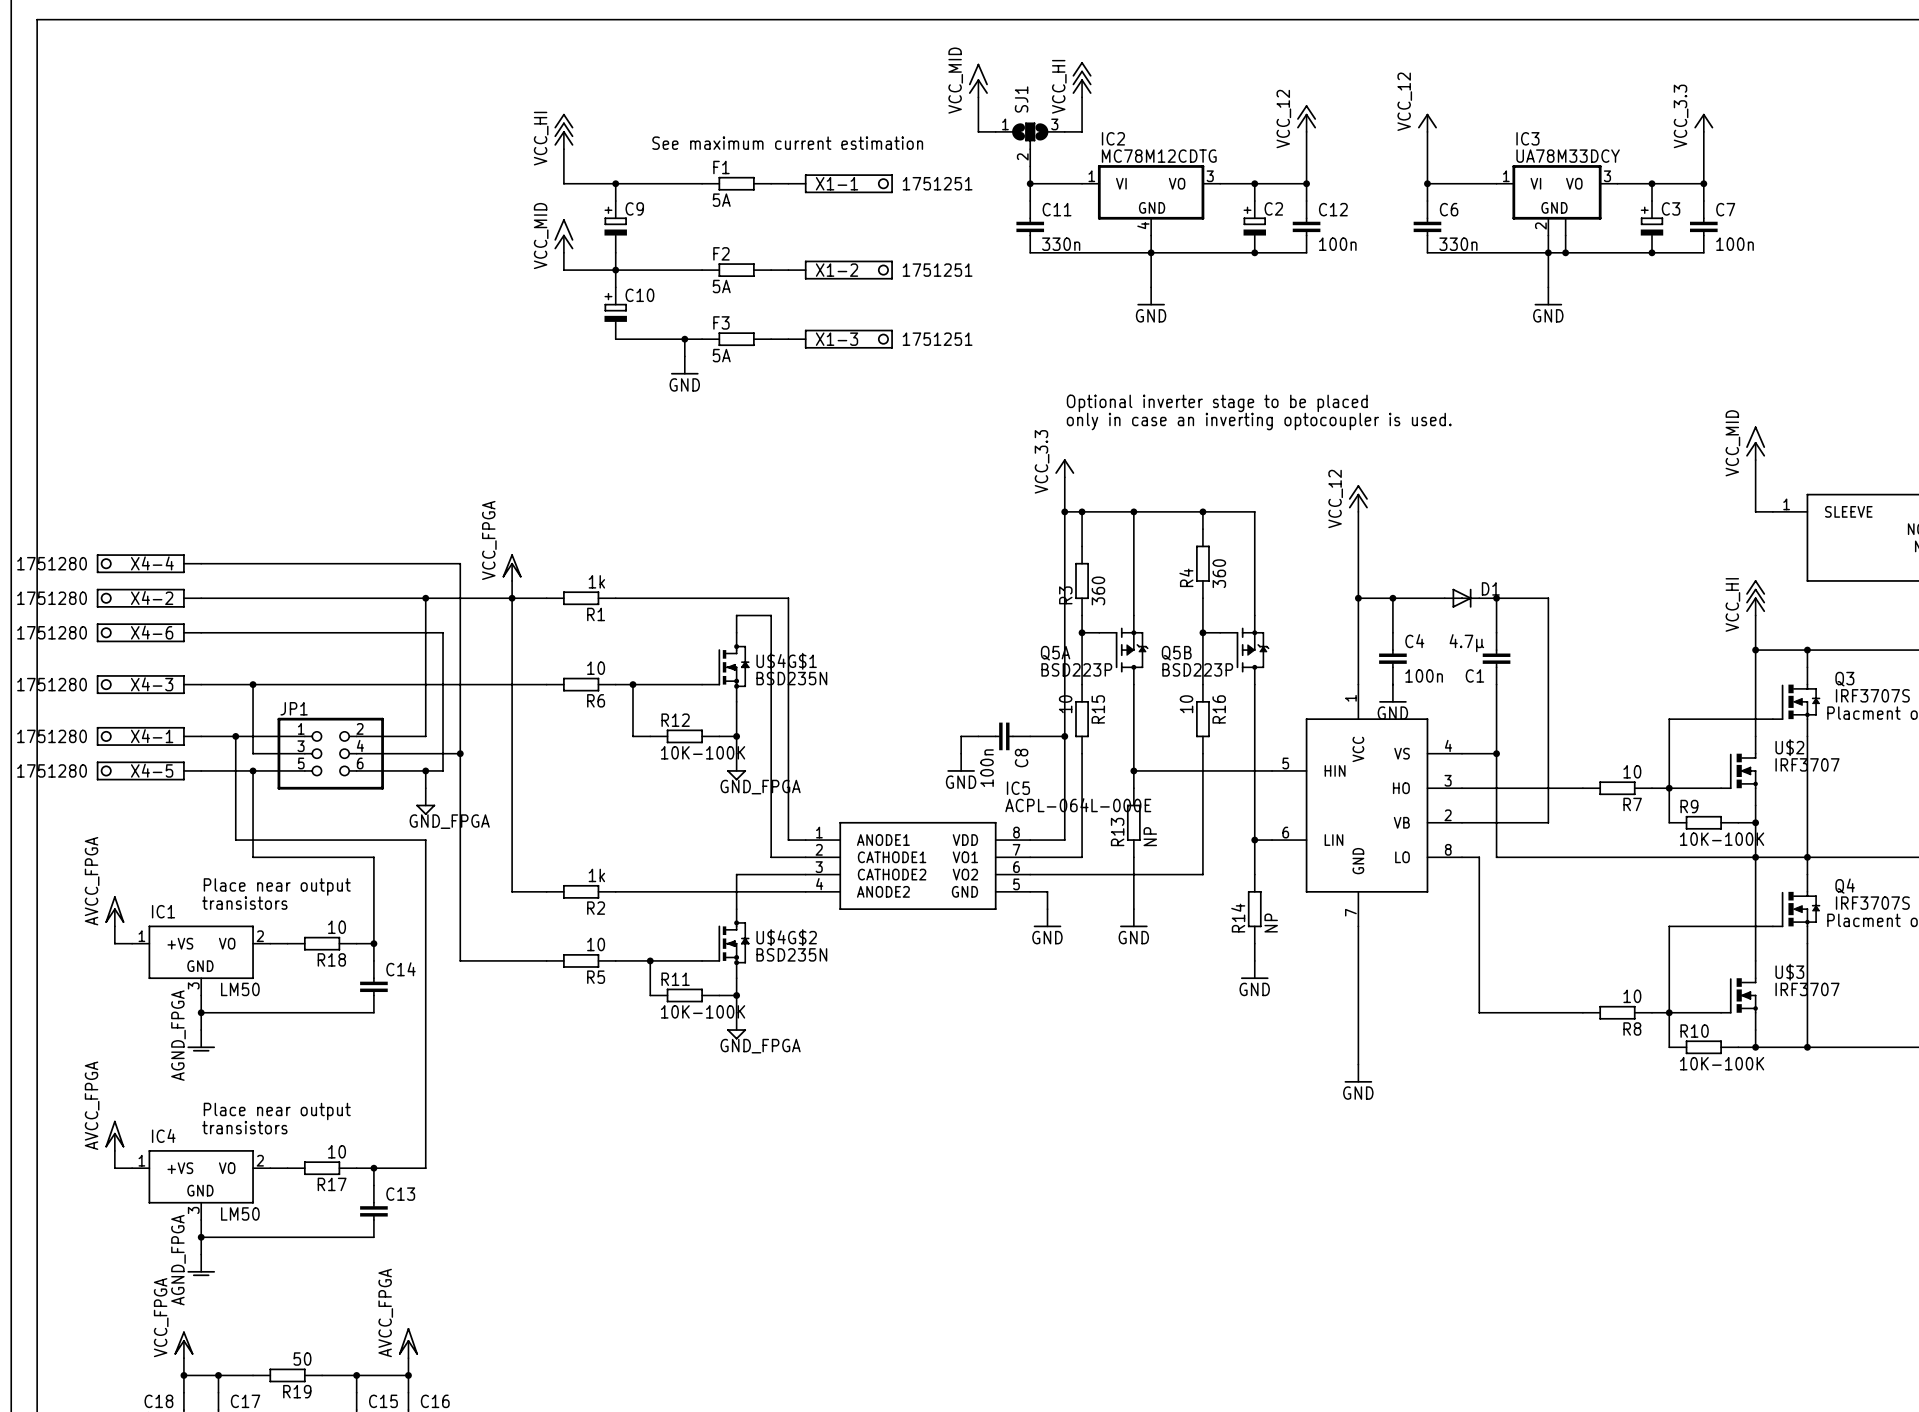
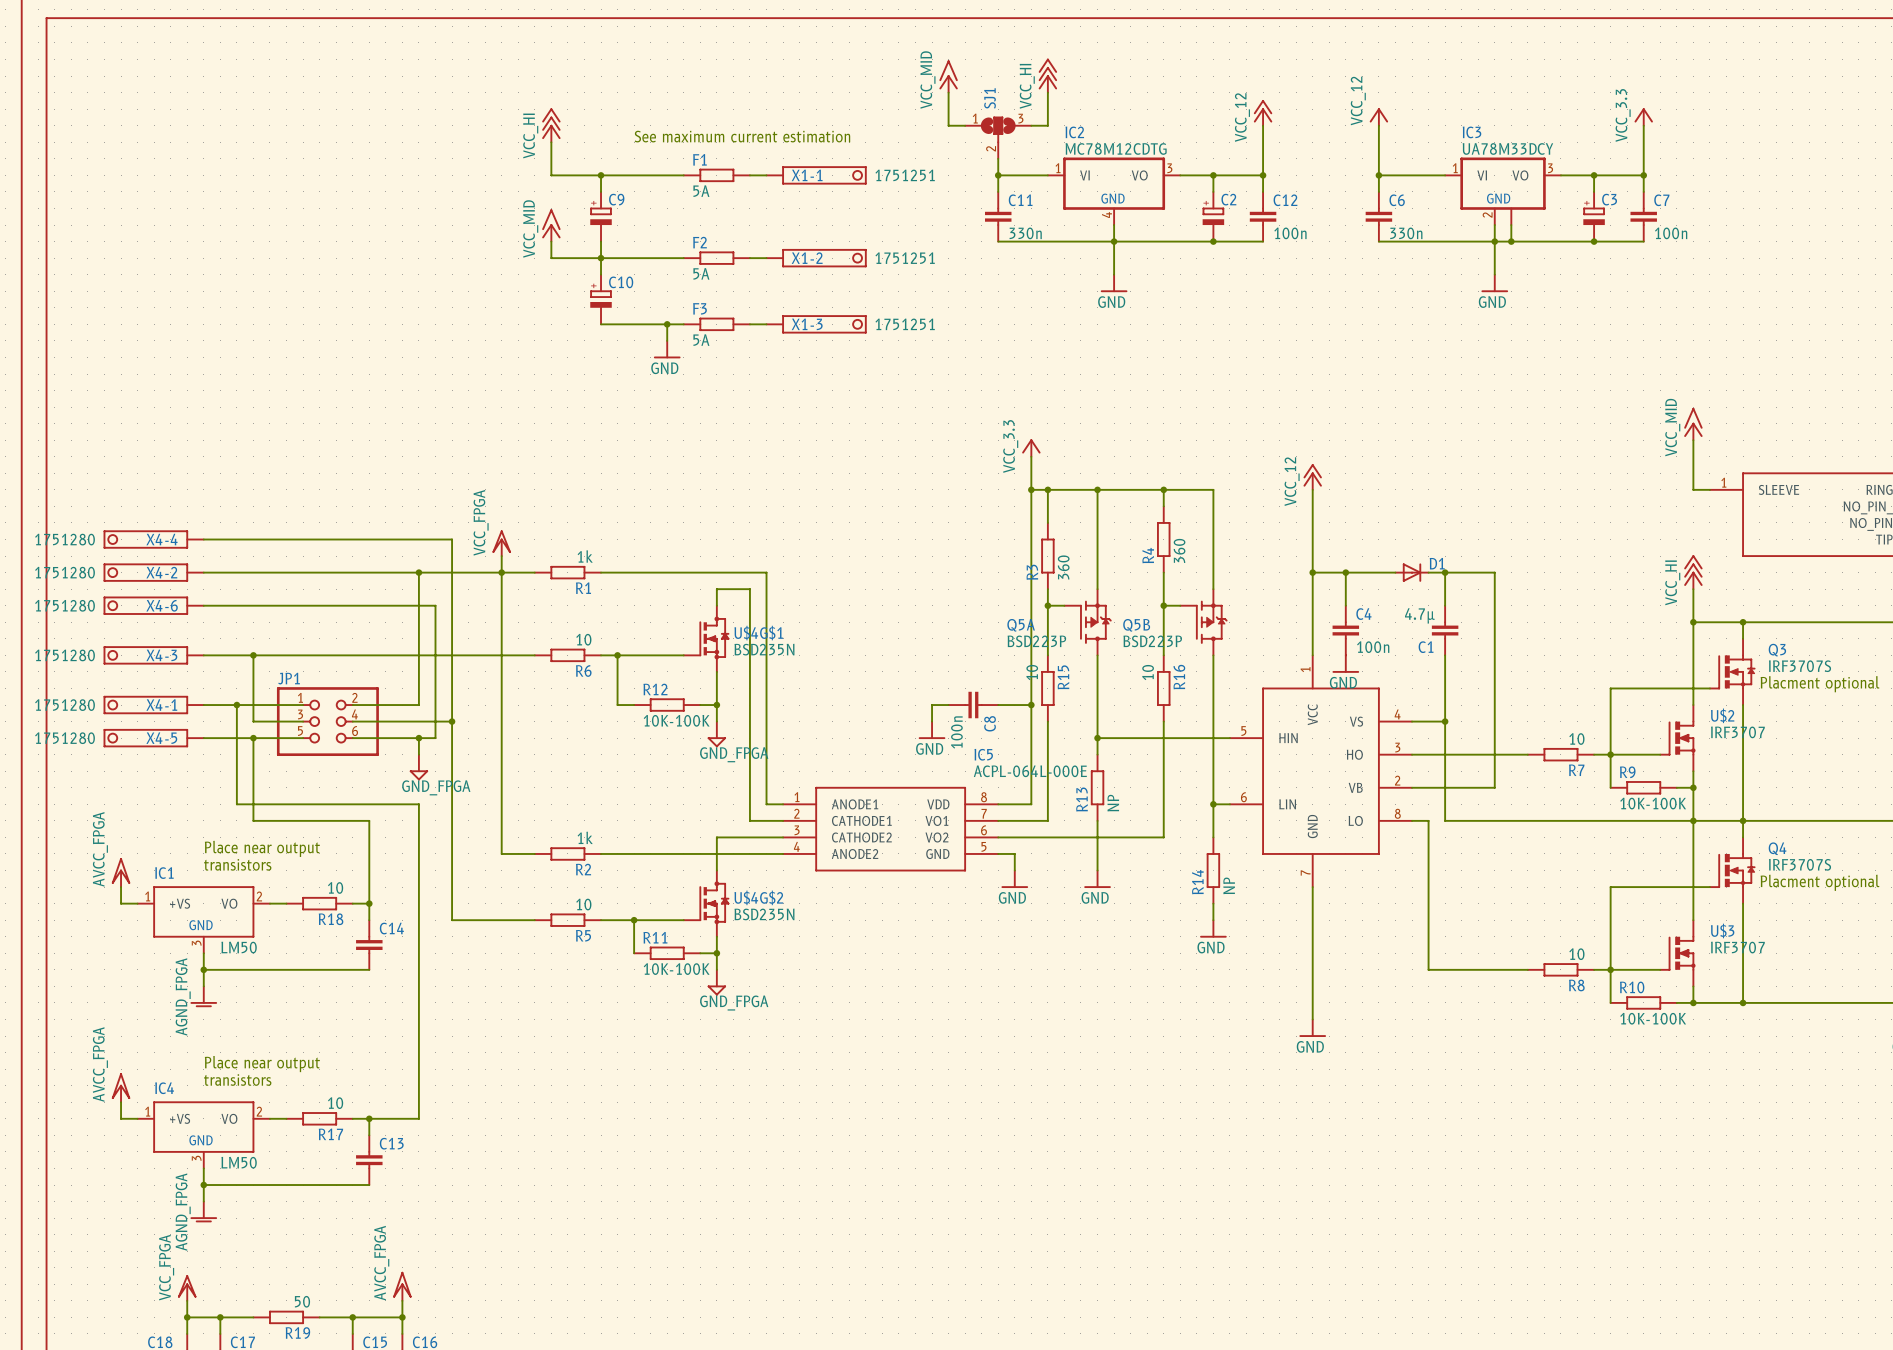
text: Optional inverter stage to be placed (1217, 403) -> none
text: only in case an inverting optocoupler is used. (1259, 421) -> none

